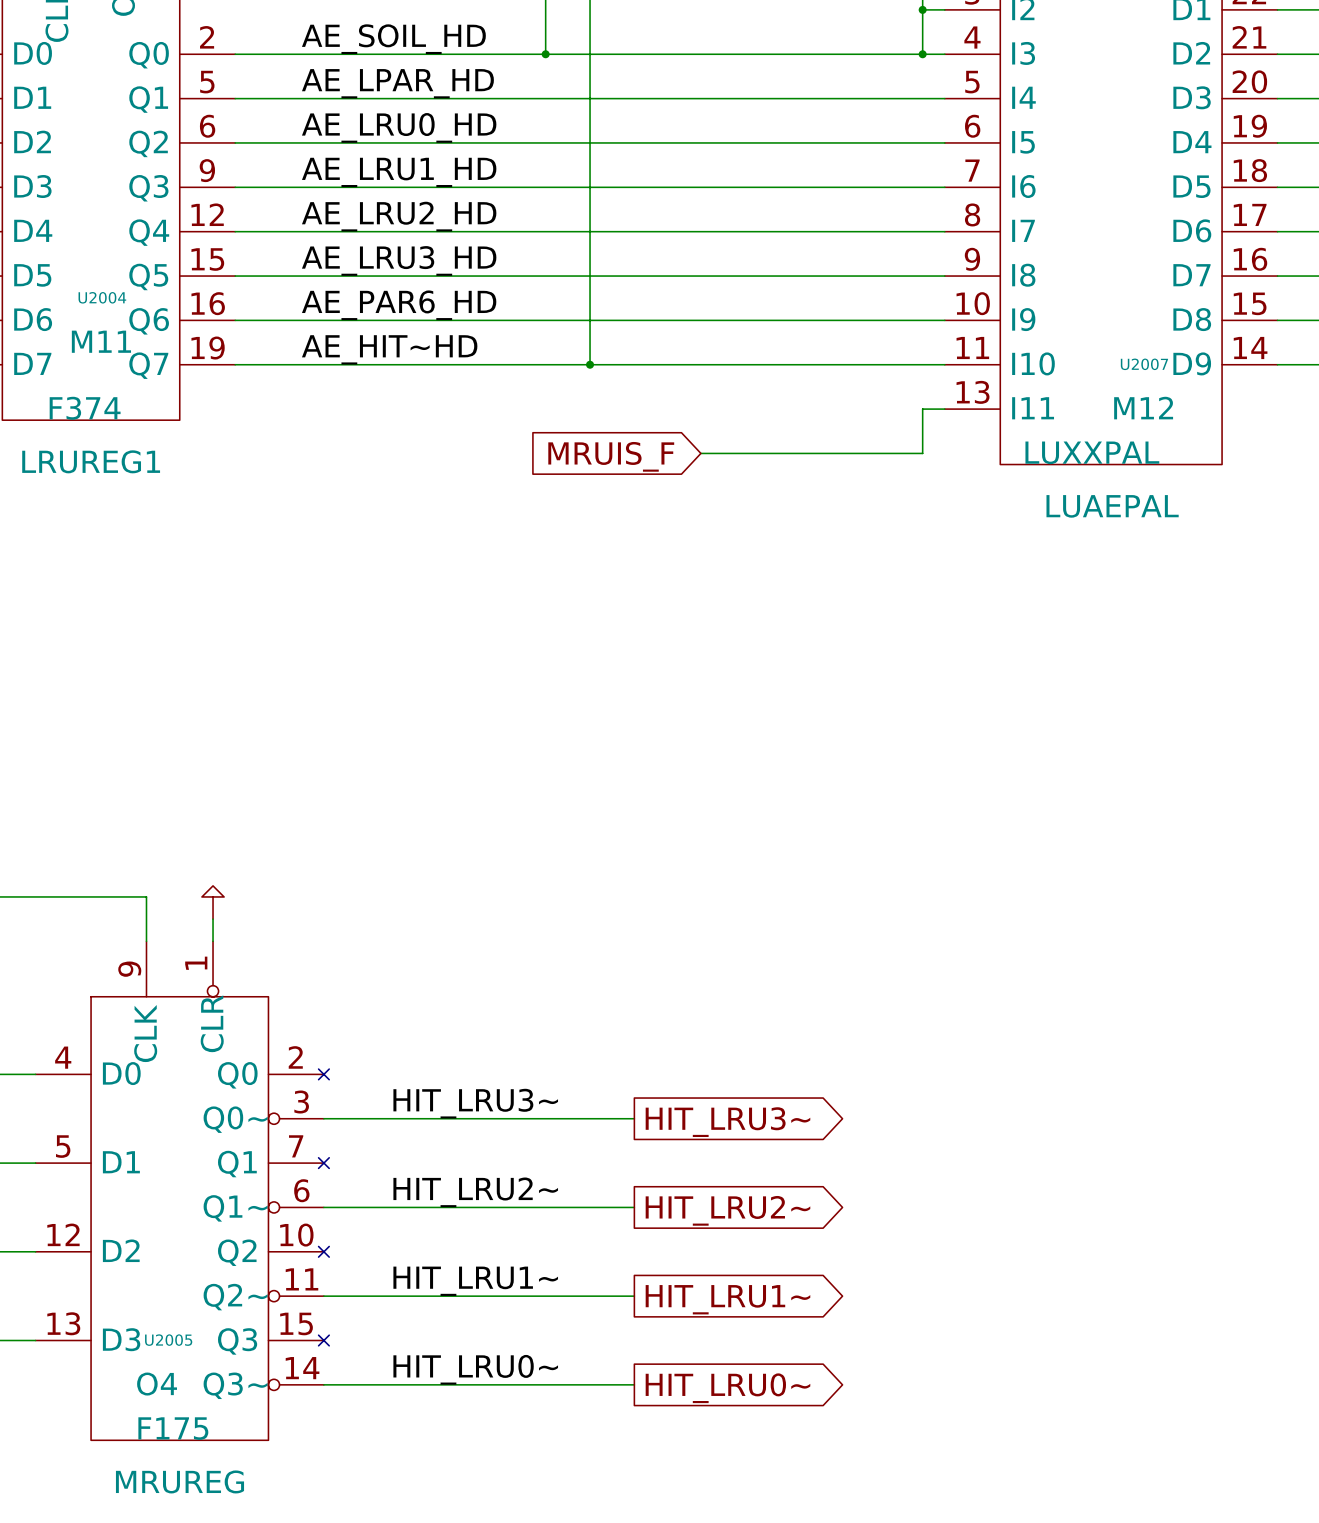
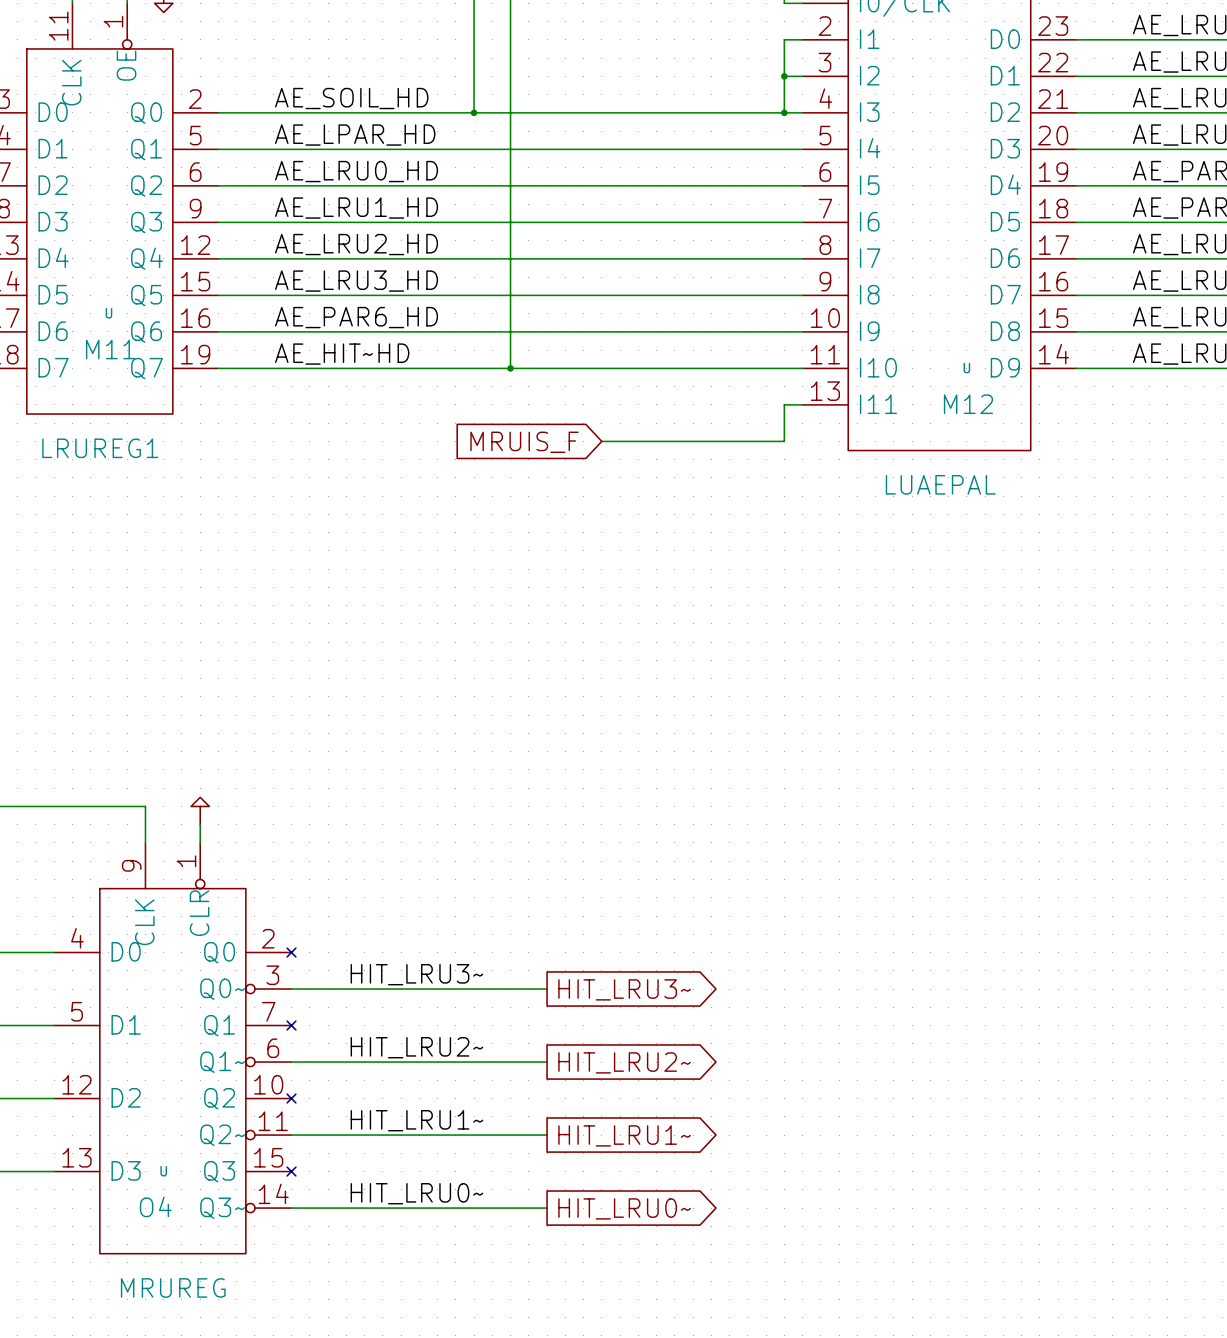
U2004 name: U2004 (102, 297) -> U (108, 313)
U2007 name: U2007 (1144, 364) -> U (966, 368)
U2004 value: F374 (85, 408) -> none
U2007 value: LUXXPAL (1092, 452) -> none
U2005 name: U2005 (168, 1340) -> U (163, 1171)
U2005 value: F175 (173, 1428) -> none

